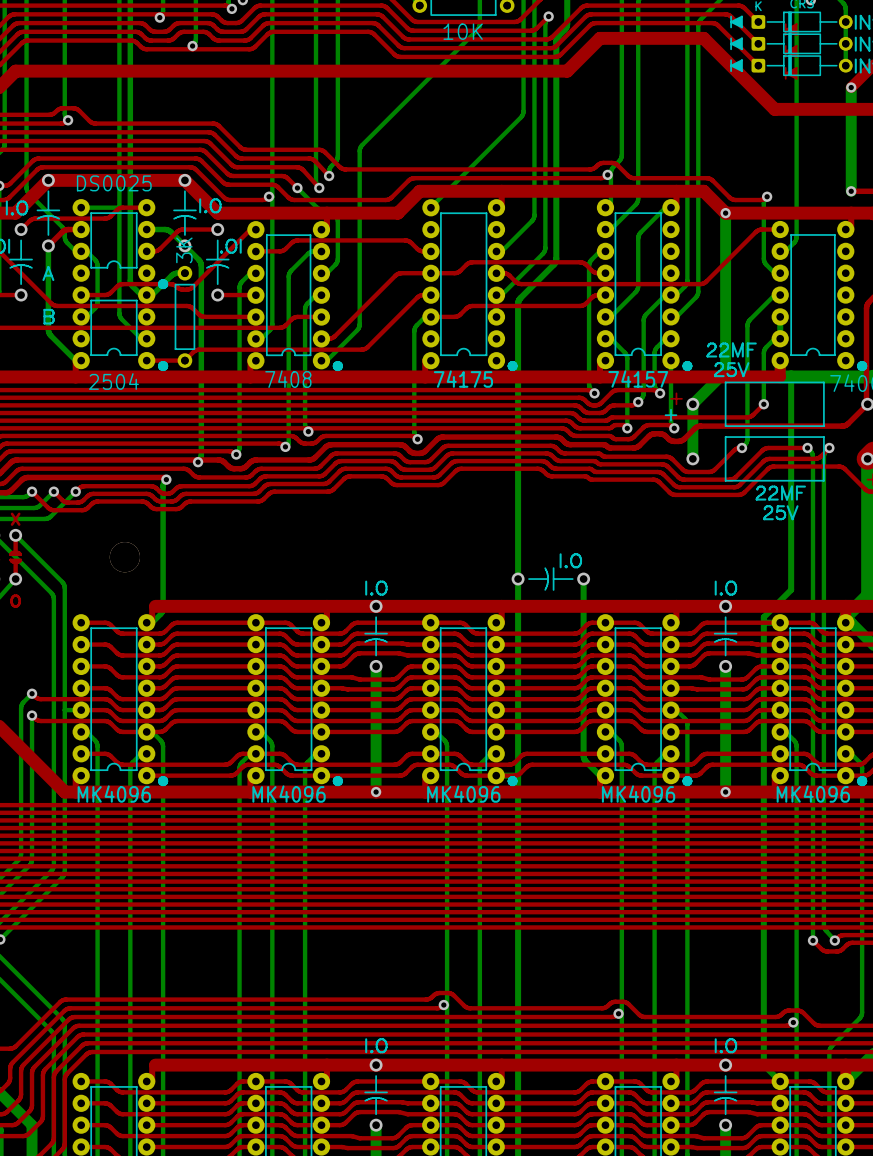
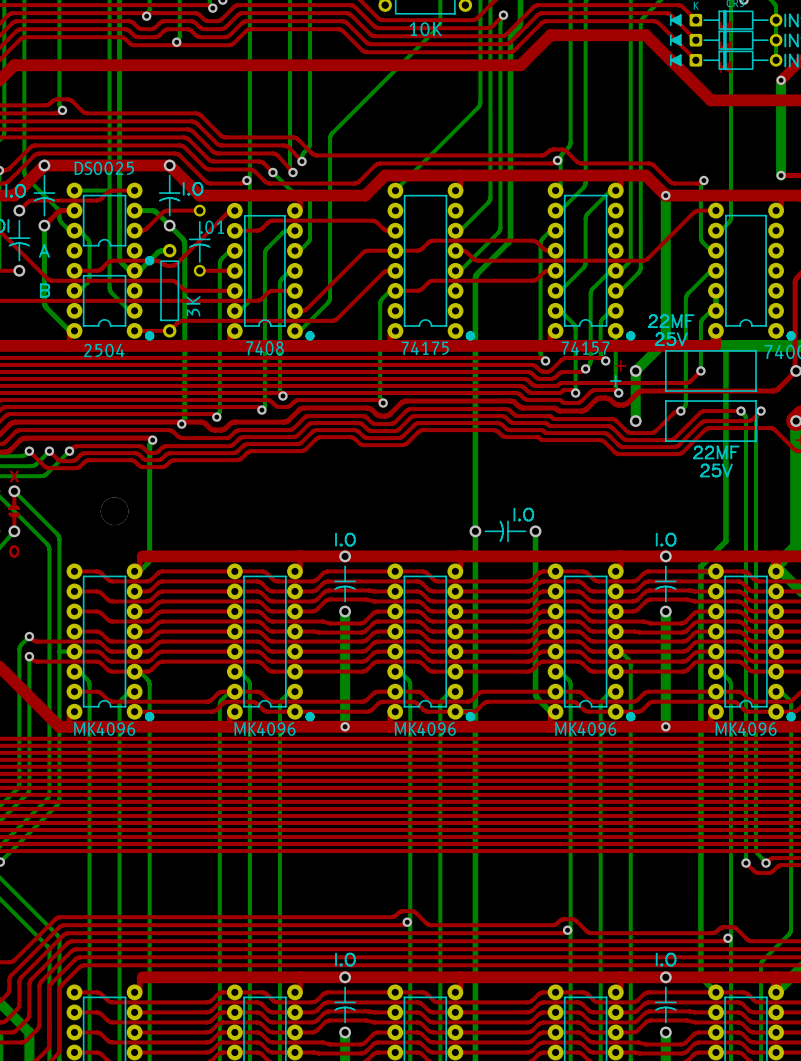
via: (217, 229) -> none
line: (230, 239) (227, 242) (226, 247) (228, 252) (232, 252) (235, 249) (236, 244) (233, 240) (230, 239) -> none
line: (240, 239) (240, 252) -> none
line: (217, 240) (217, 259) -> none
part value position: 3K (184, 250) -> 3K (193, 306)
line: (221, 251) (220, 252) (221, 252) (222, 252) (221, 251) -> none
line: (206, 259) (228, 259) -> none
part: none -> .01 (199, 240)
line: (217, 265) (217, 284) -> none
line: (206, 267) (216, 265) (228, 267) -> none
via: (217, 295) -> none

